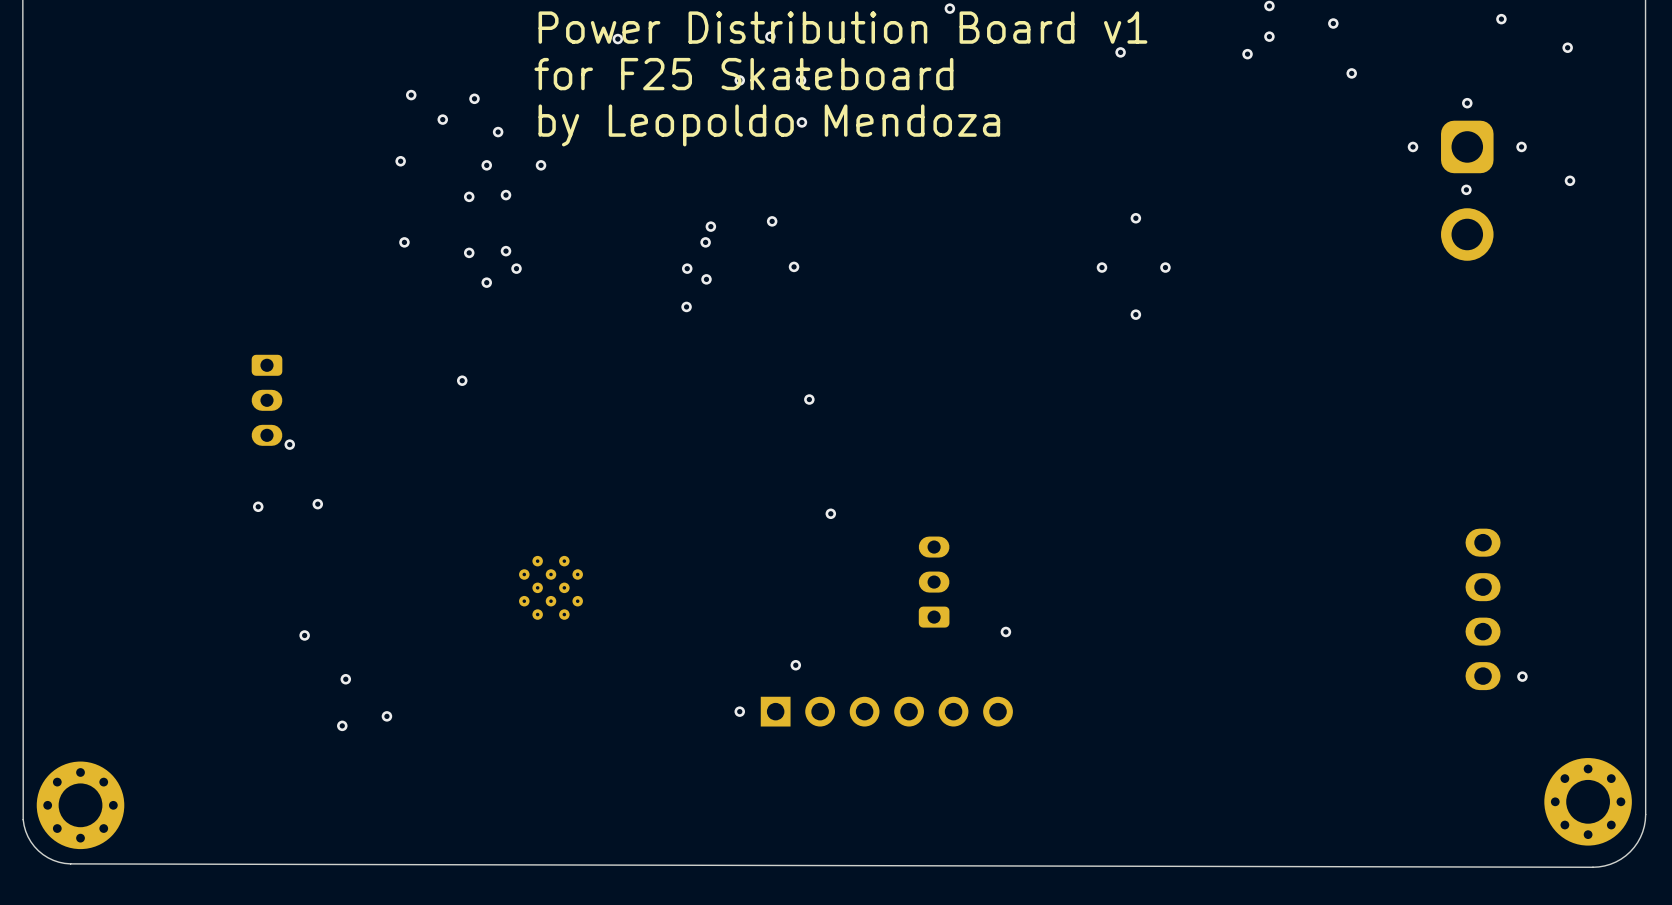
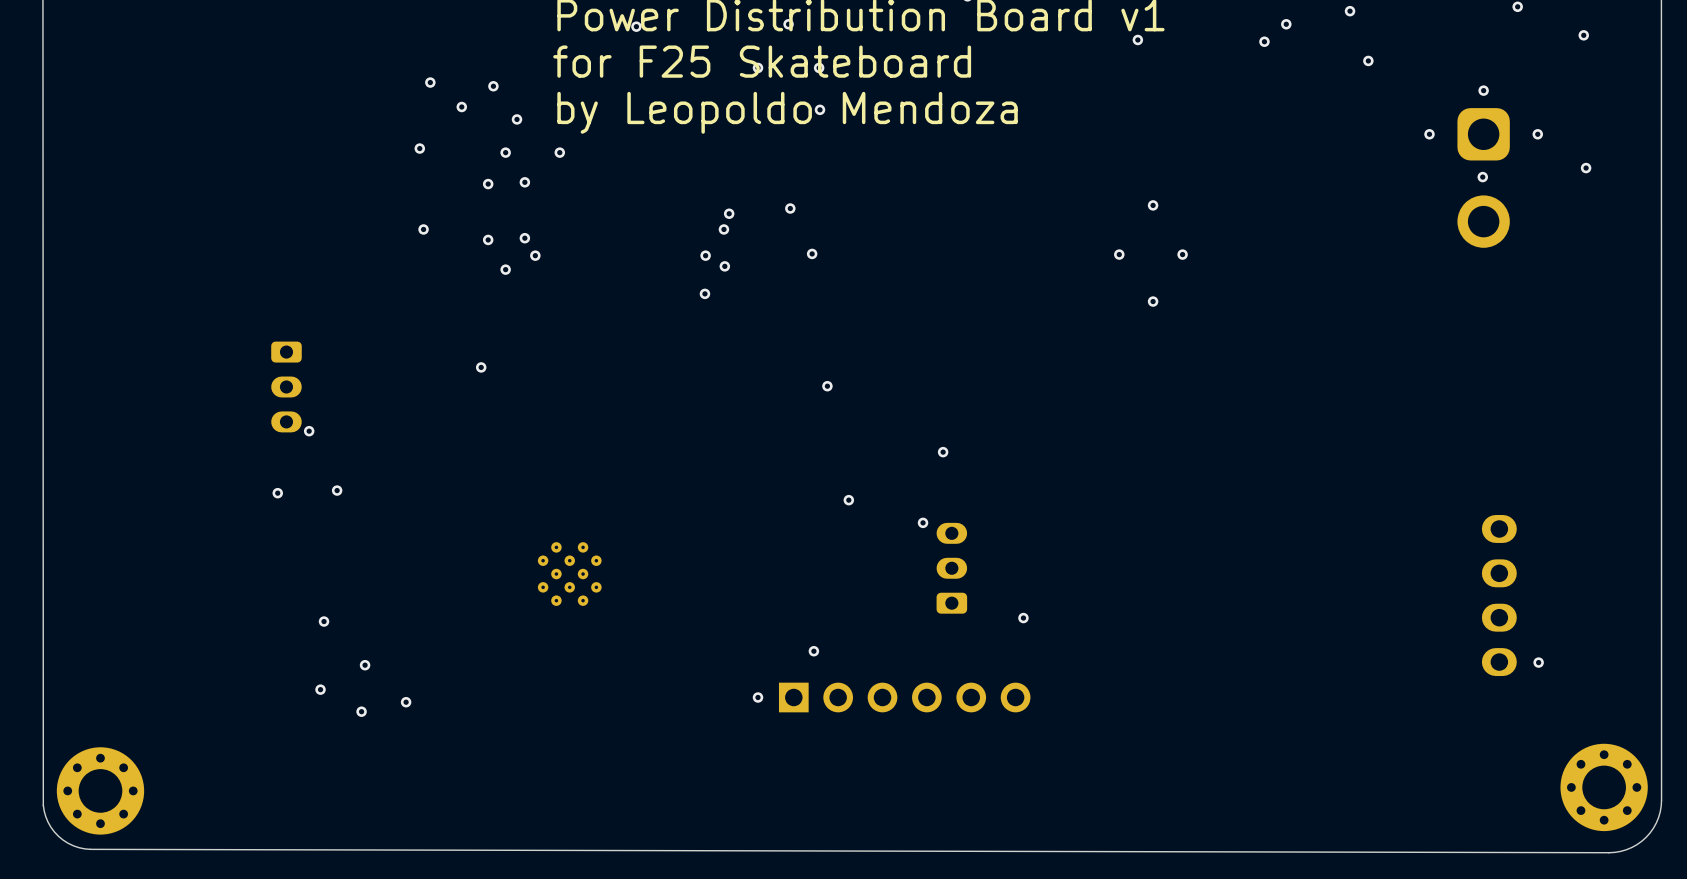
via: none -> (943, 452)
via: none -> (923, 522)
via: none -> (320, 689)

